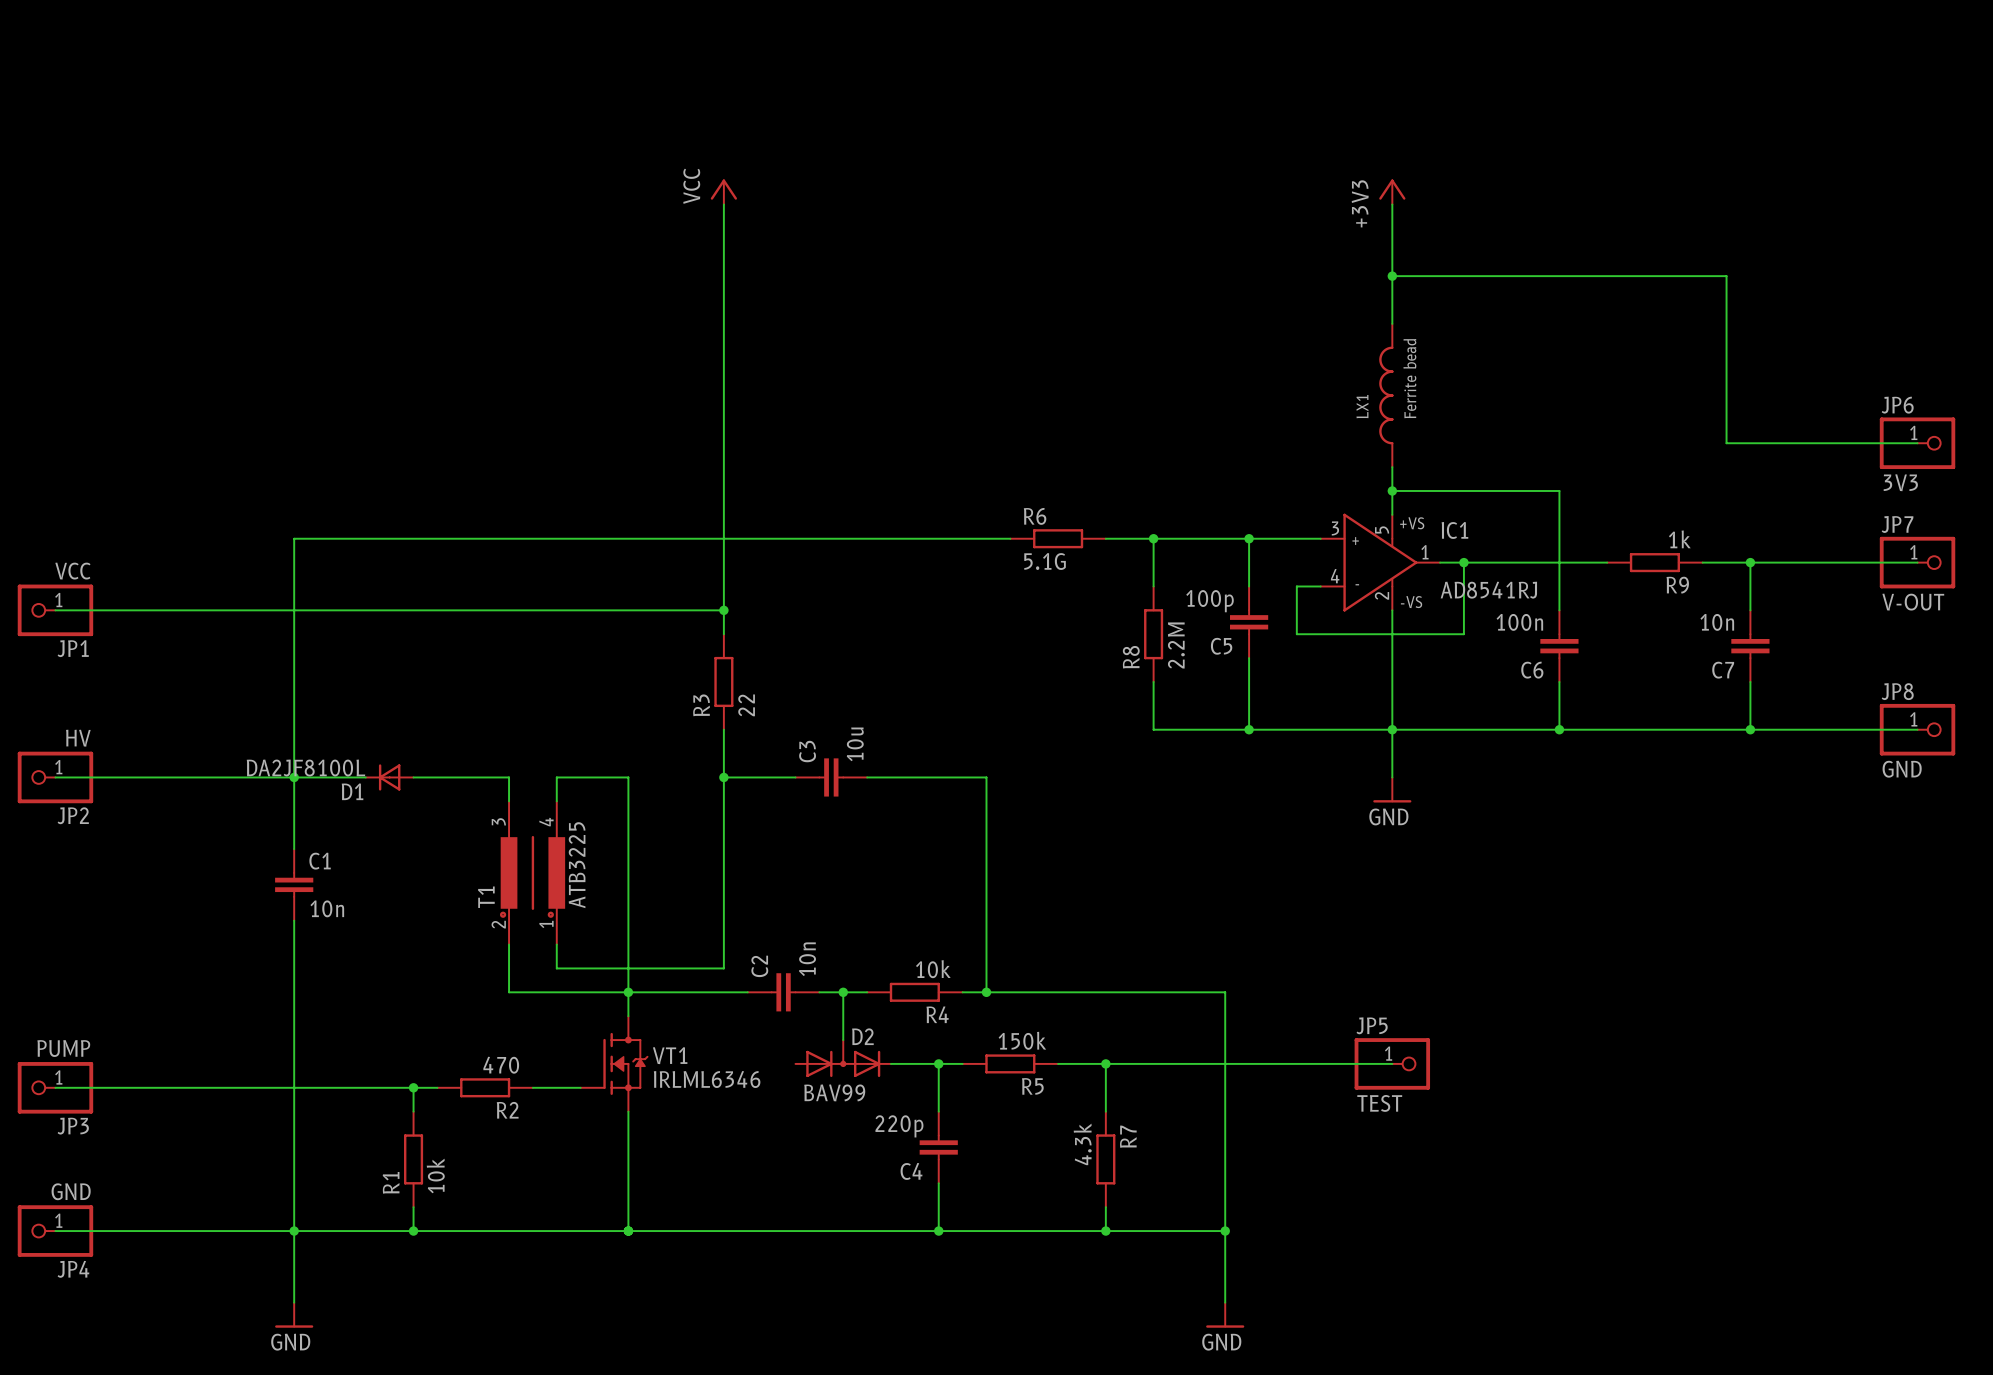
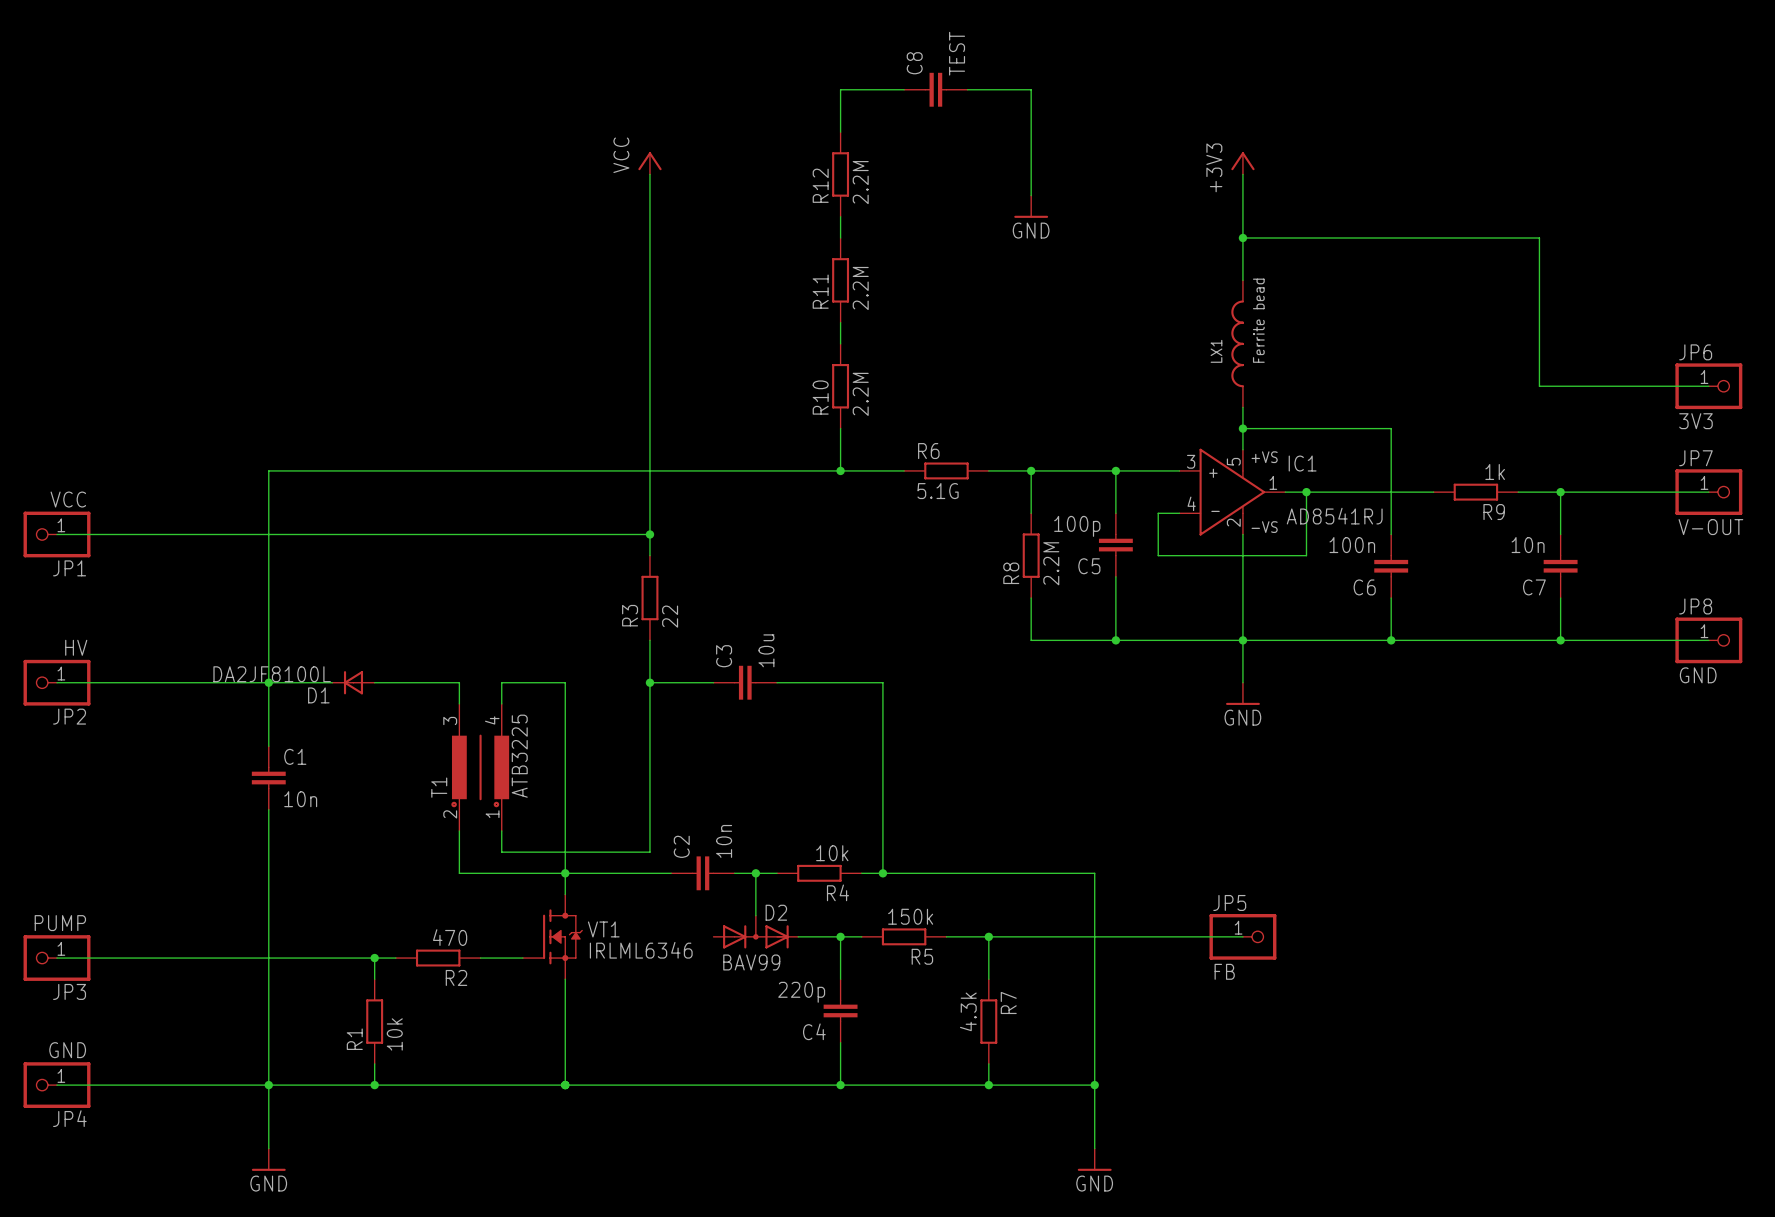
wire: none -> (904, 89) (840, 89) (840, 132)
C8: none -> TEST (935, 89)
wire: none -> (967, 89) (1031, 89) (1031, 195)
R12: none -> 2.2M (840, 174)
power symbol: none -> GND (1031, 206)
wire: none -> (840, 216) (840, 238)
R11: none -> 2.2M (840, 280)
wire: none -> (840, 322) (840, 343)
R10: none -> 2.2M (840, 386)
wire: none -> (840, 428) (840, 470)
junction: none -> (840, 470)
JP5 value: TEST (1379, 1103) -> FB (1224, 971)

